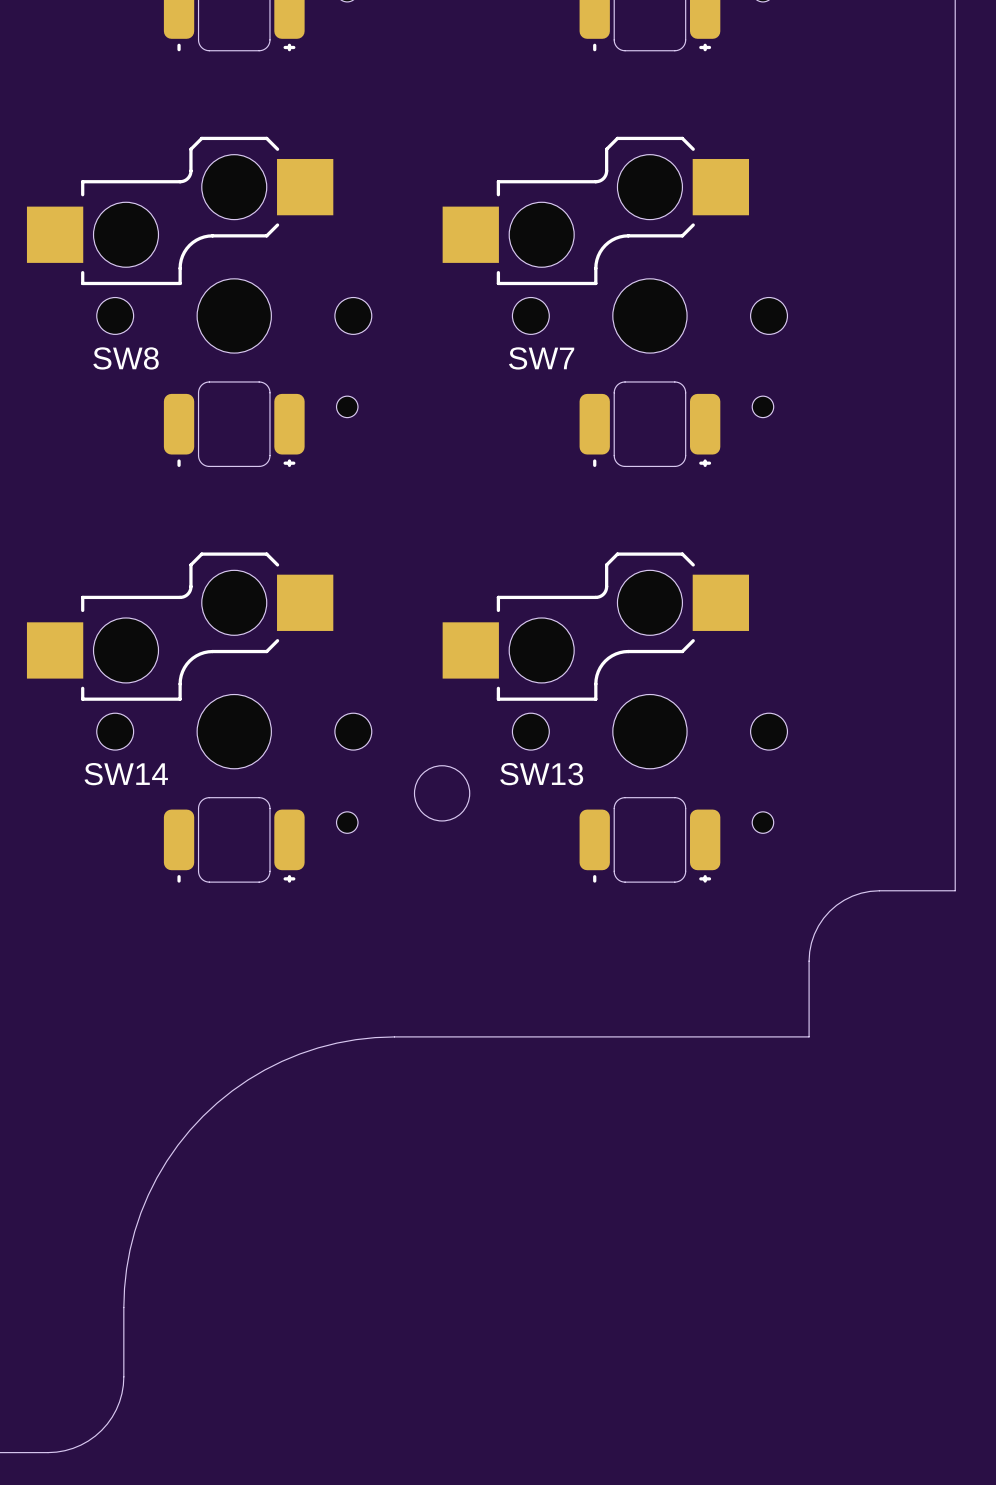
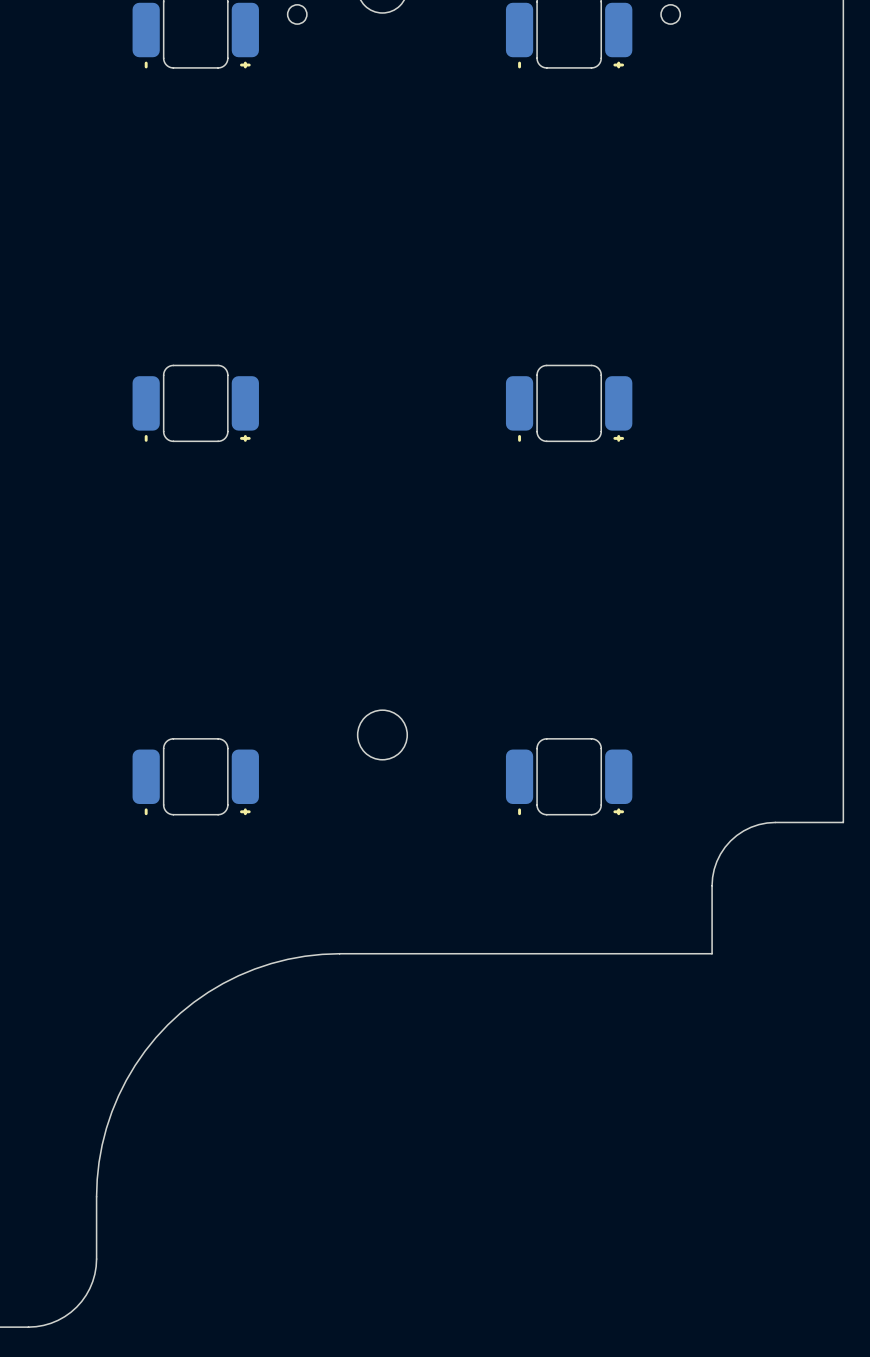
SW8: (199, 277) -> none
SW7: (615, 277) -> none
SW14: (199, 692) -> none
SW13: (615, 692) -> none

